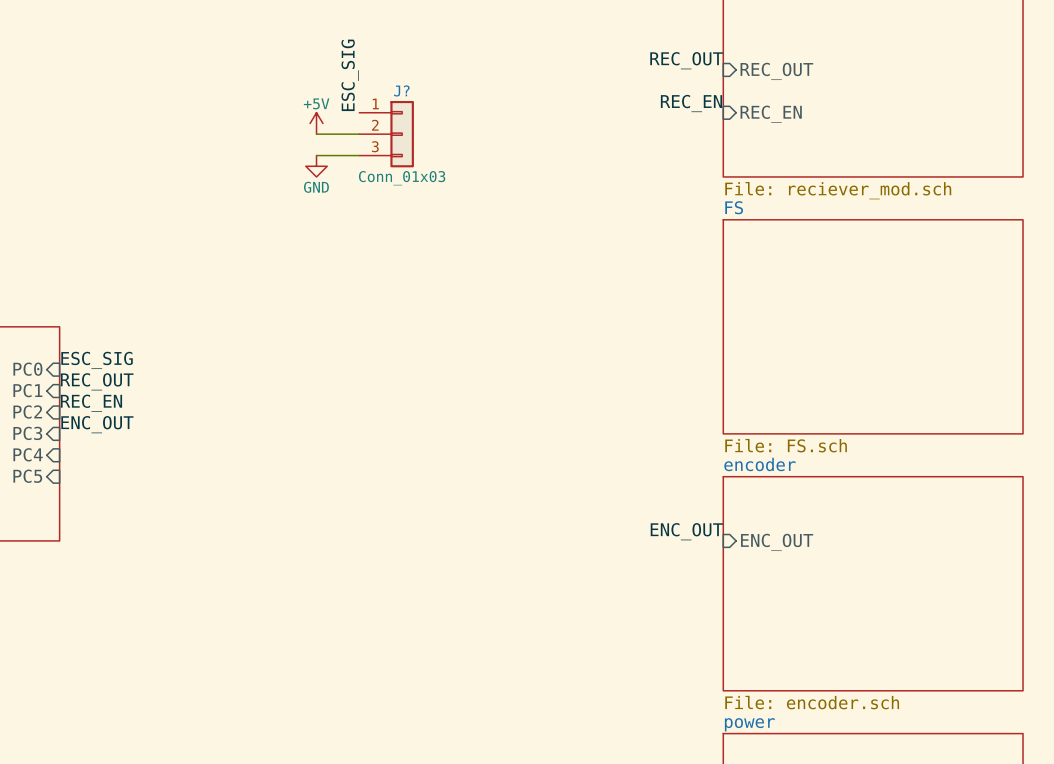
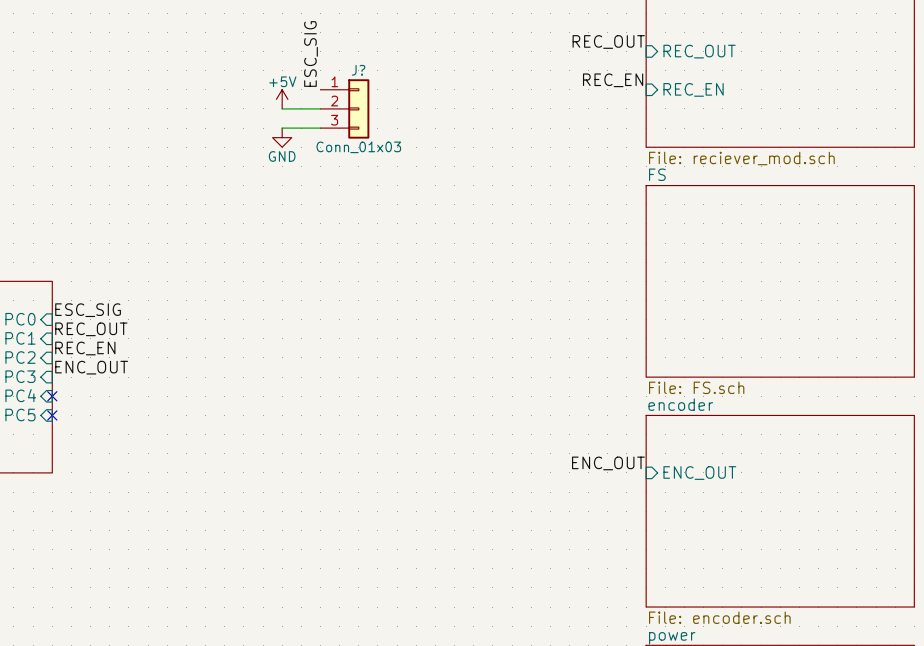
no-connect mark: none -> (52, 396)
no-connect mark: none -> (52, 415)

